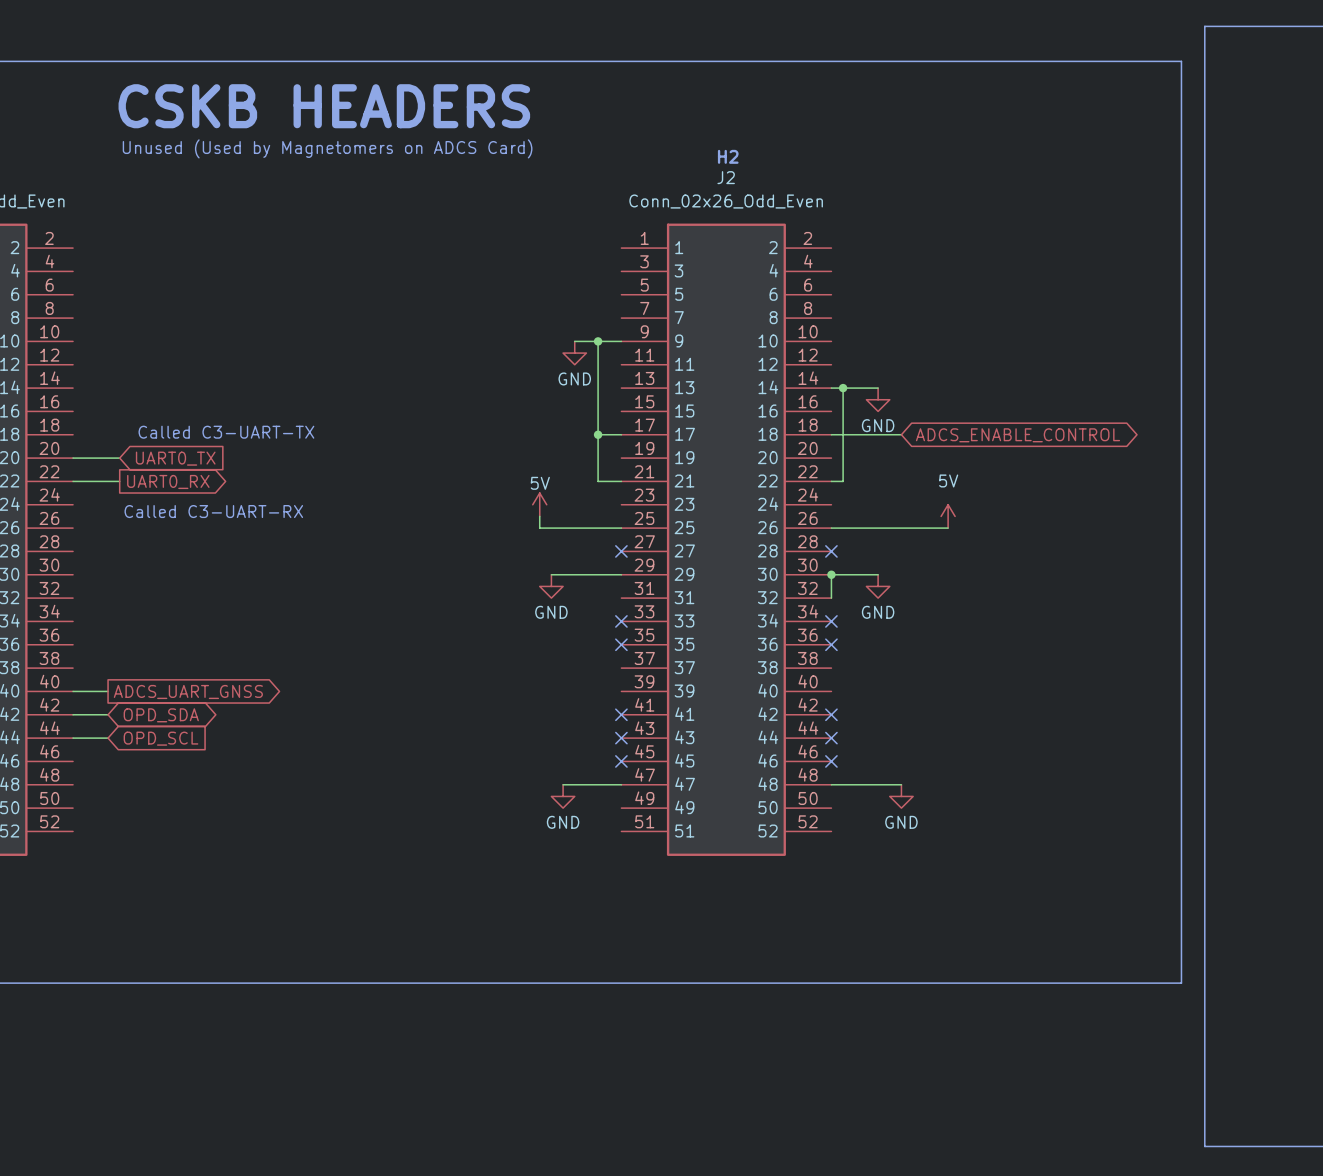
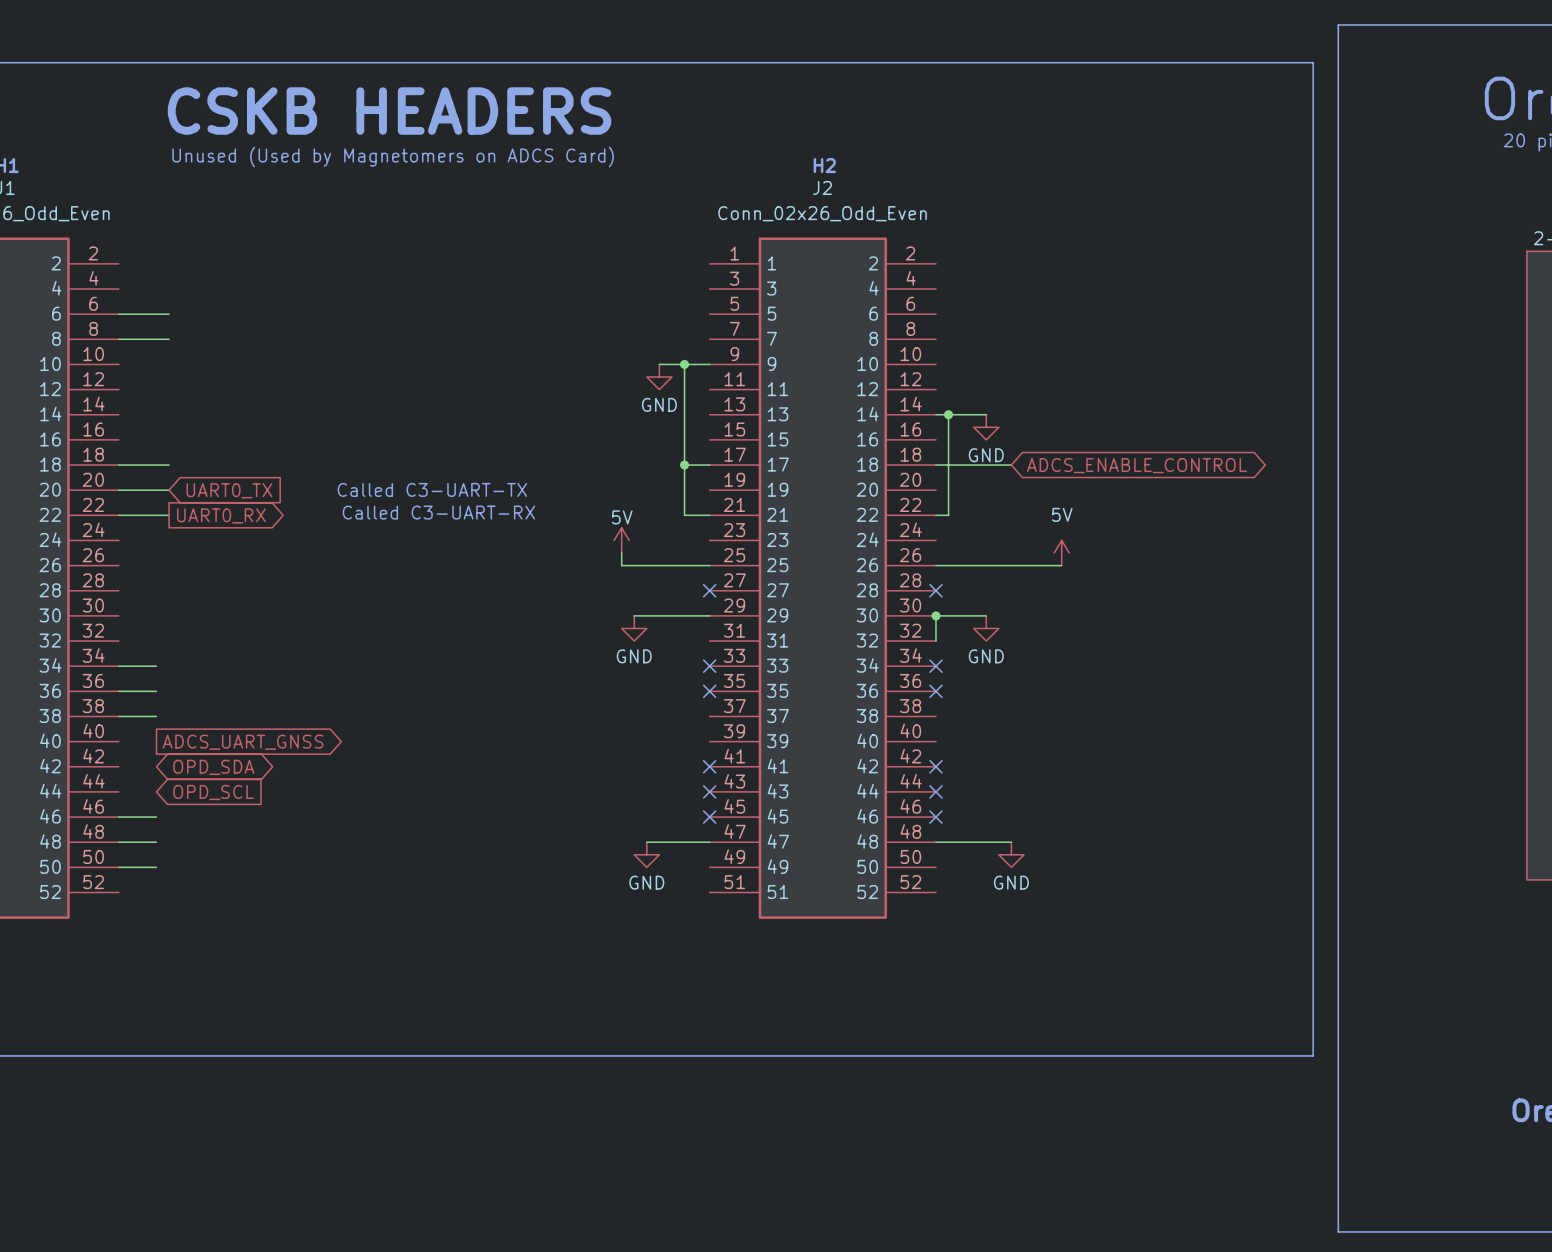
wire: none -> (118, 314) (169, 314)
wire: none -> (118, 339) (169, 339)
text position: Called C3-UART-TX (226, 432) -> Called C3-UART-TX (432, 489)
wire: none -> (118, 465) (169, 465)
text position: Called C3-UART-RX (213, 511) -> Called C3-UART-RX (438, 512)
wire: (73, 691) (108, 691) -> (118, 666) (156, 666)
wire: (73, 714) (108, 714) -> (118, 691) (156, 691)
wire: (73, 738) (108, 738) -> (118, 716) (156, 716)
wire: none -> (118, 817) (156, 817)
wire: none -> (118, 842) (156, 842)
wire: none -> (118, 867) (156, 867)

